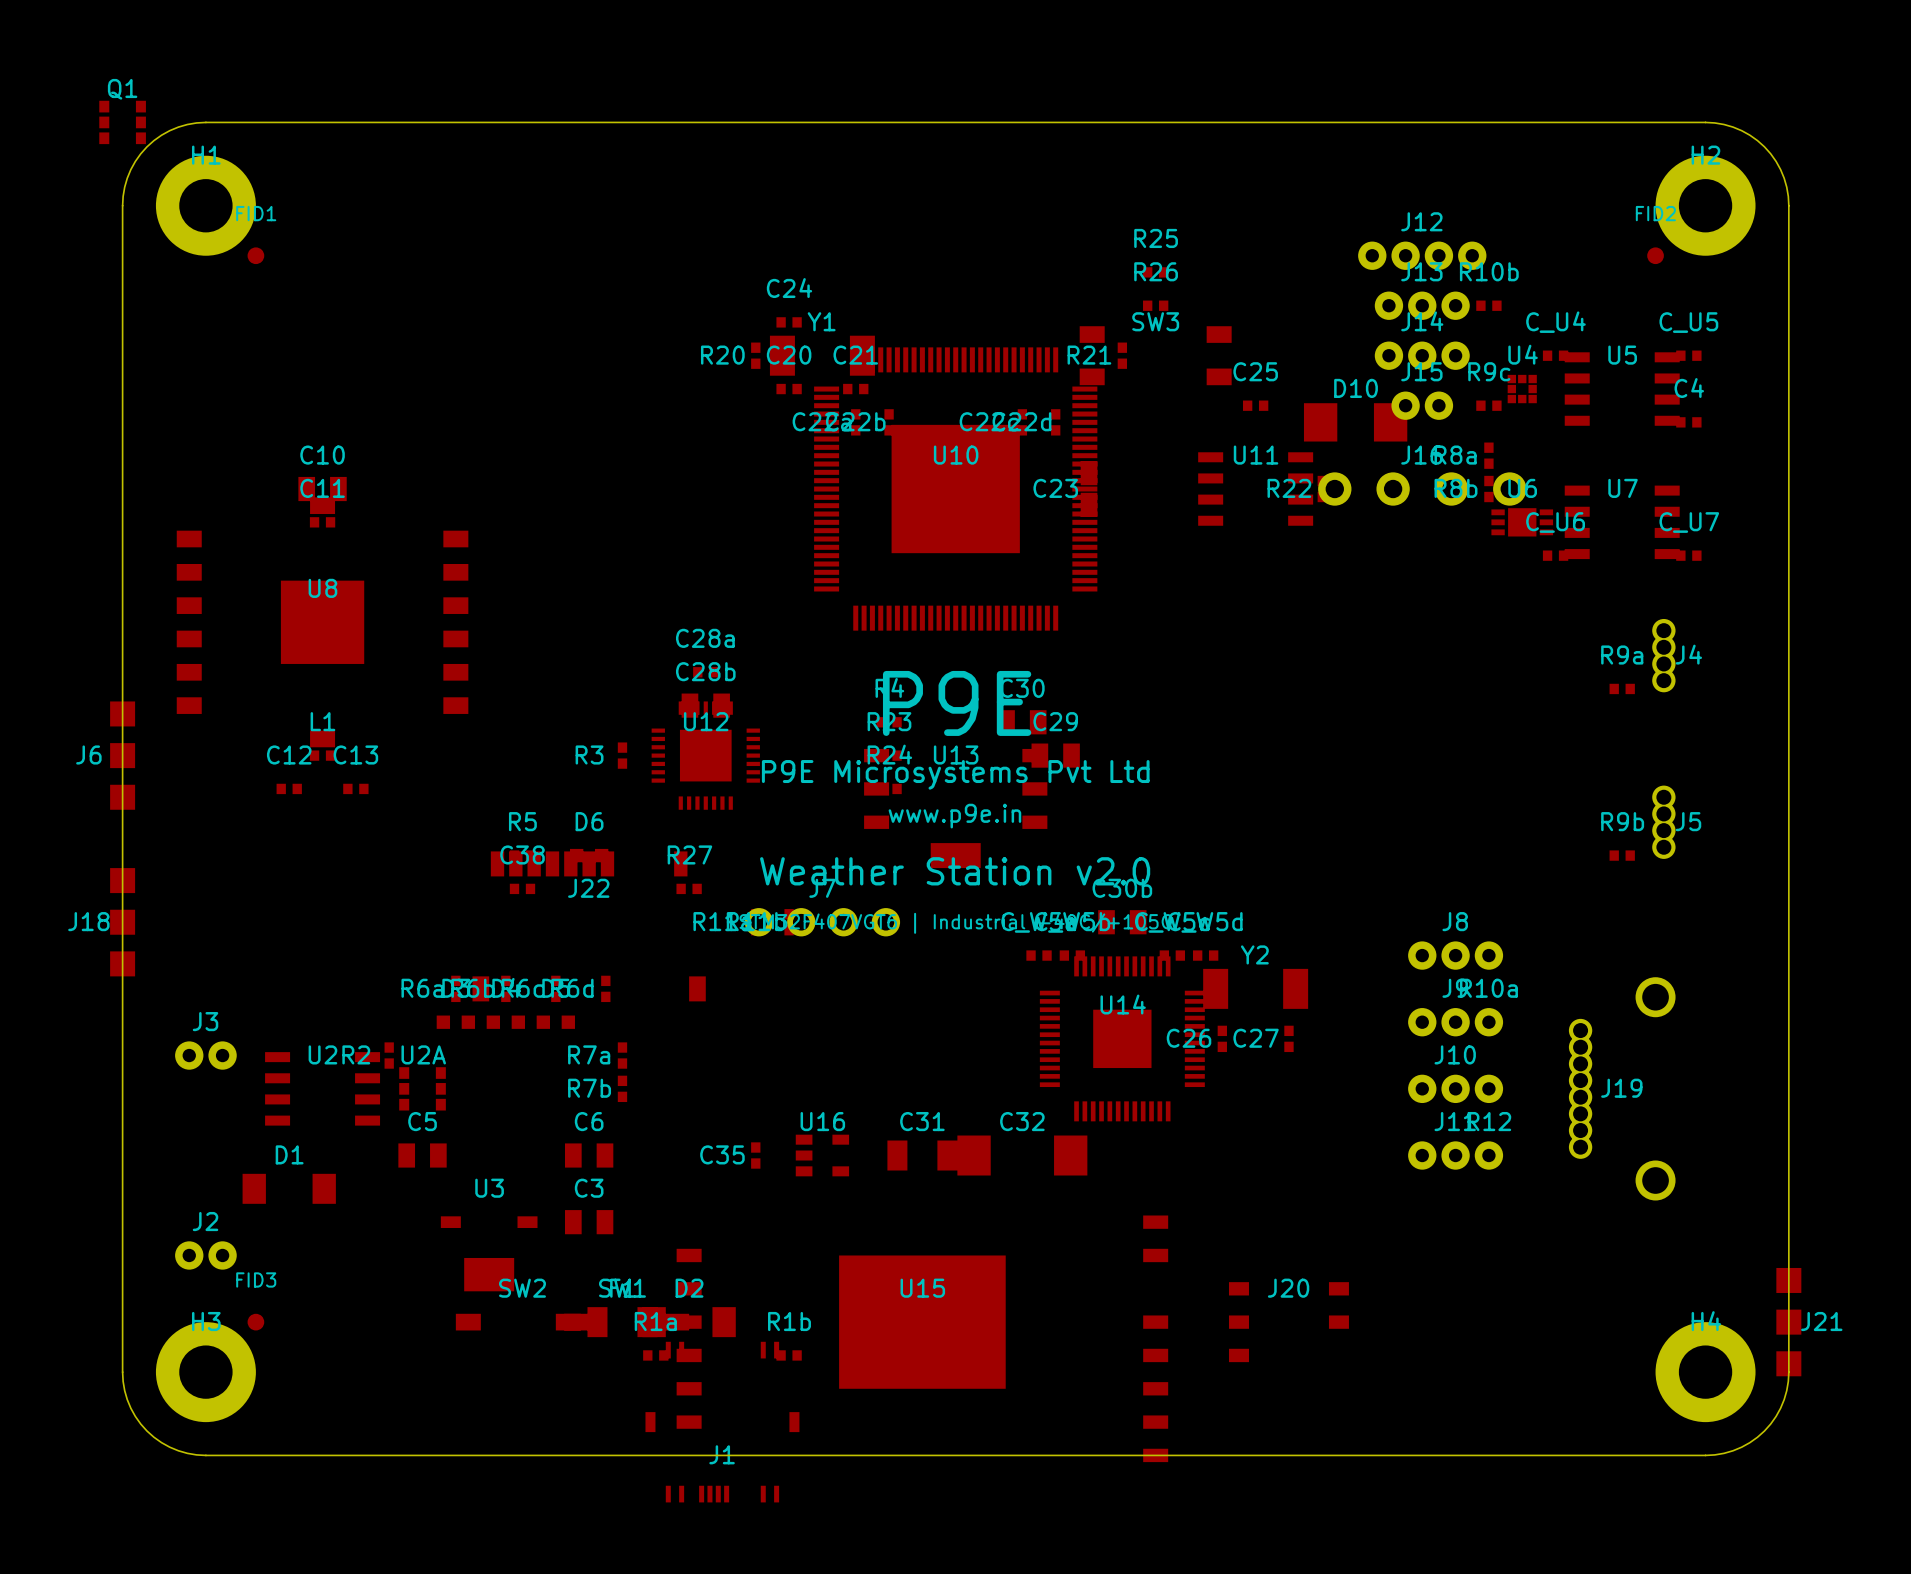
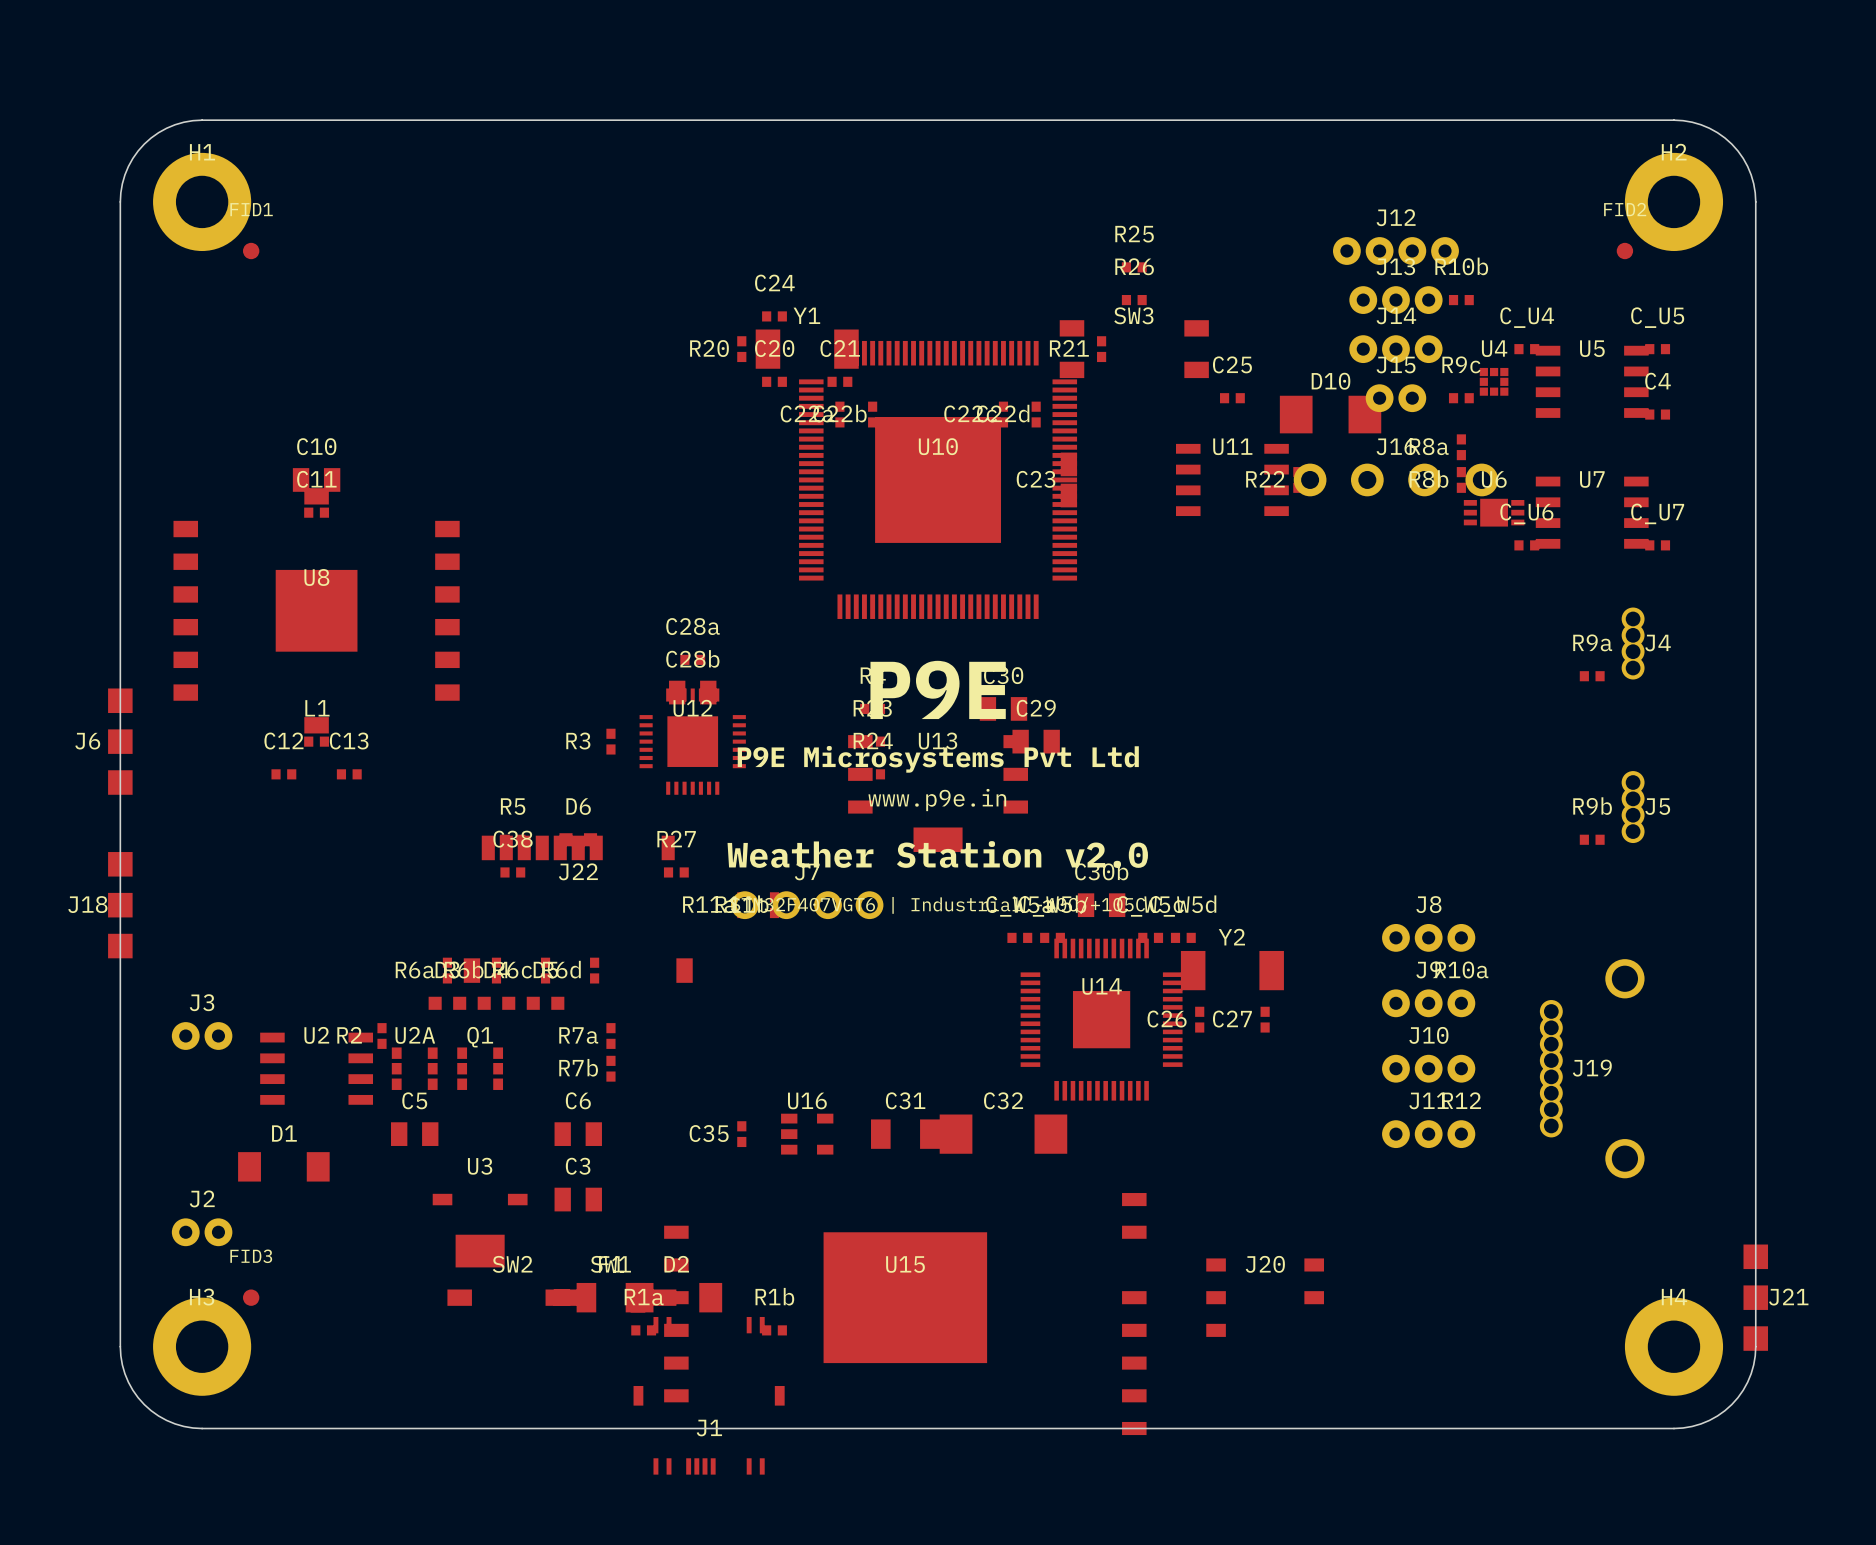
Q1 position: (122, 122) -> (480, 1068)

